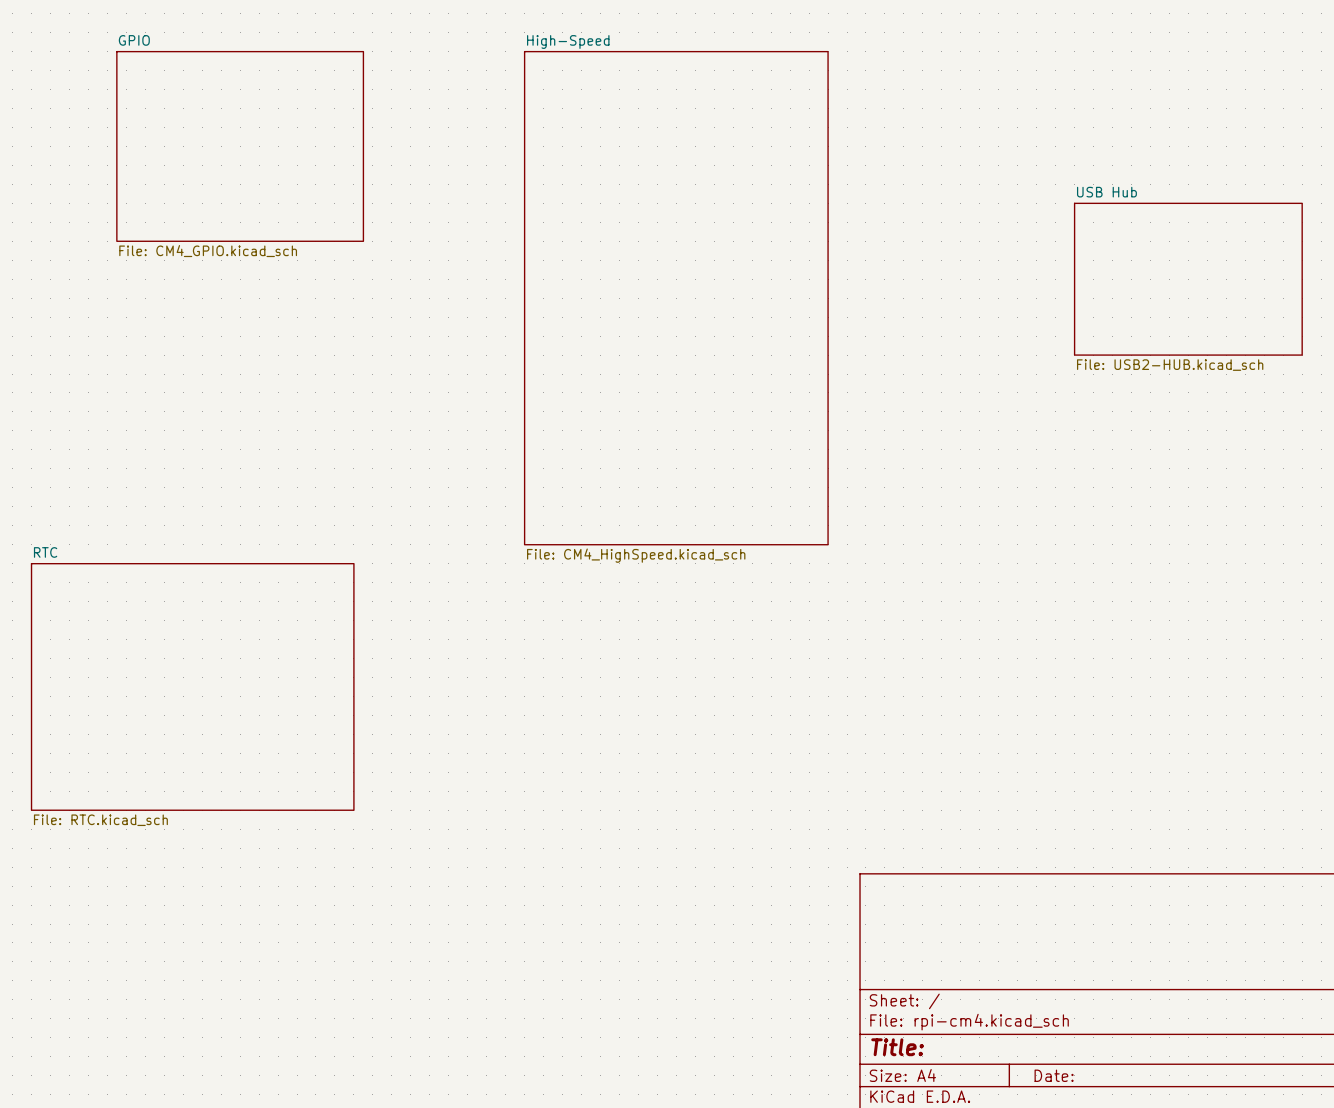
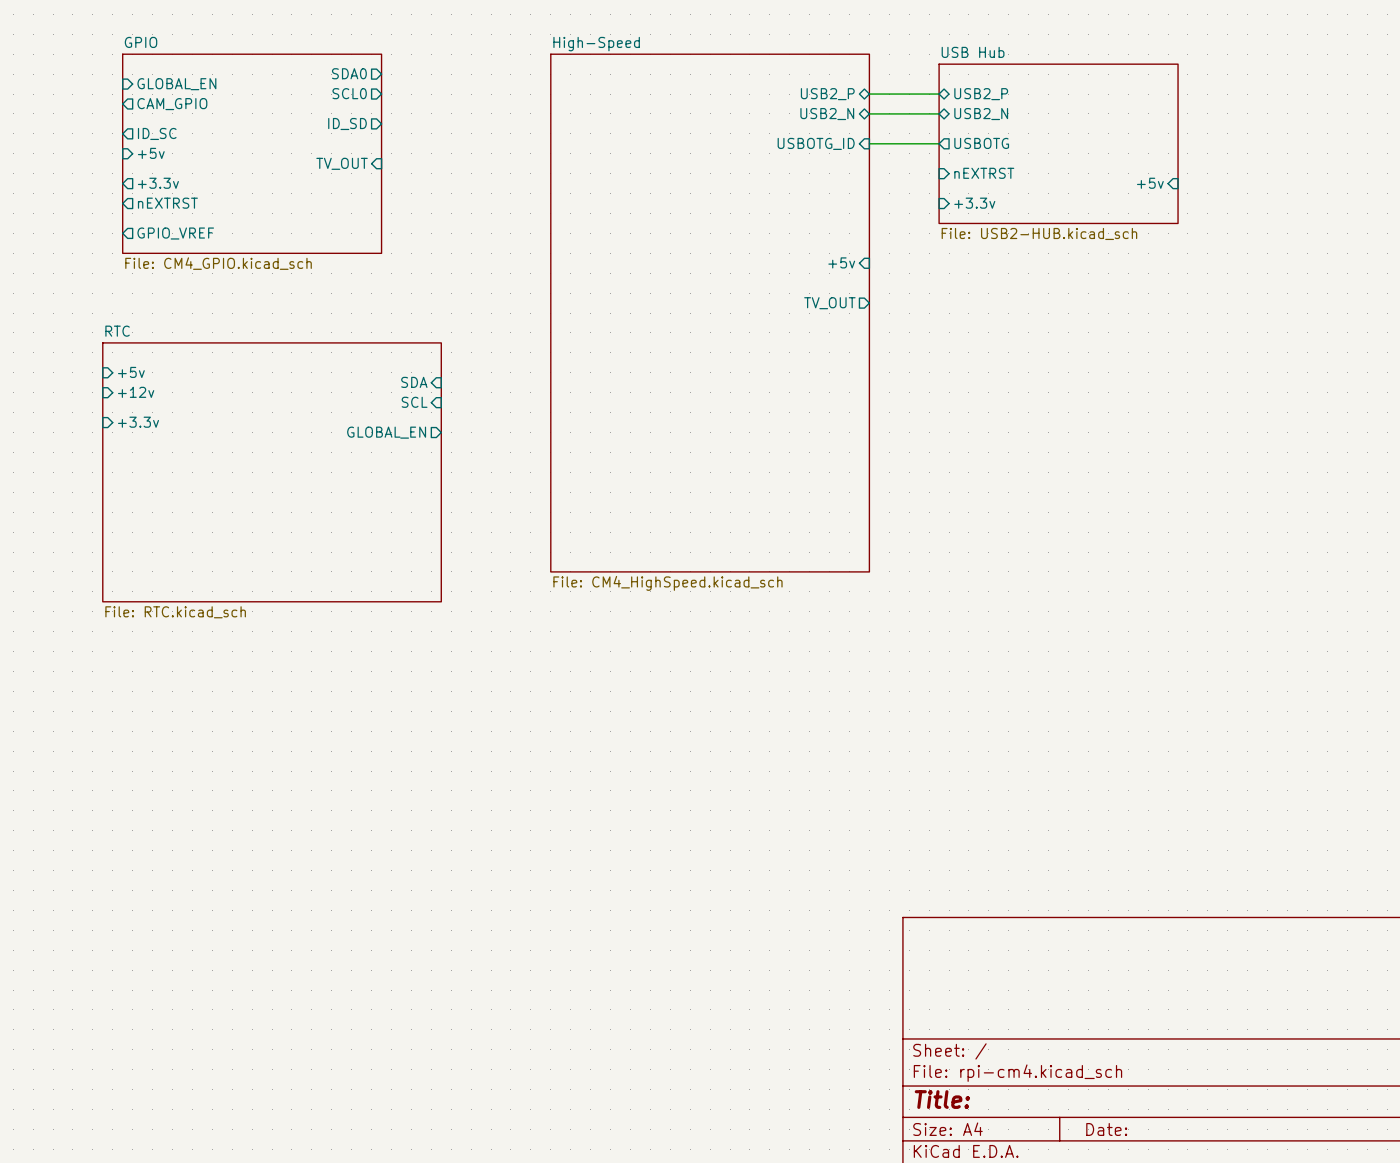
sheet pin: none -> SDA0 (349, 73)
sheet pin: none -> GLOBAL_EN (176, 84)
sheet pin: none -> SCL0 (349, 93)
sheet pin: none -> USB2_P (827, 94)
wire: none -> (869, 94) (939, 94)
sheet pin: none -> USB2_P (981, 94)
sheet pin: none -> CAM_GPIO (172, 104)
sheet pin: none -> USB2_N (827, 114)
wire: none -> (869, 113) (939, 113)
sheet pin: none -> USB2_N (981, 114)
sheet pin: none -> ID_SD (347, 124)
sheet pin: none -> ID_SC (157, 133)
wire: none -> (869, 143) (939, 143)
sheet pin: none -> USBOTG (981, 143)
sheet USB Hub: none -> File: USB2-HUB.kicad_sch (1058, 143)
sheet pin: none -> USBOTG_ID (816, 143)
sheet pin: none -> +5v (151, 153)
sheet pin: none -> TV_OUT (342, 163)
sheet pin: none -> nEXTRST (984, 173)
sheet pin: none -> +3.3v (158, 183)
sheet pin: none -> +5v (1150, 183)
sheet pin: none -> nEXTRST (167, 203)
sheet pin: none -> +3.3v (974, 203)
sheet pin: none -> GPIO_VREF (175, 233)
sheet pin: none -> +5v (841, 262)
sheet USB Hub: File: USB2-HUB.kicad_sch (1188, 279) -> none
sheet pin: none -> TV_OUT (829, 303)
sheet pin: none -> +5v (131, 372)
sheet pin: none -> SDA (414, 382)
sheet pin: none -> +12v (136, 392)
sheet pin: none -> SCL (414, 402)
sheet pin: none -> +3.3v (138, 422)
sheet pin: none -> GLOBAL_EN (386, 432)
sheet RTC: none -> File: RTC.kicad_sch (272, 472)
sheet RTC: File: RTC.kicad_sch (192, 686) -> none

